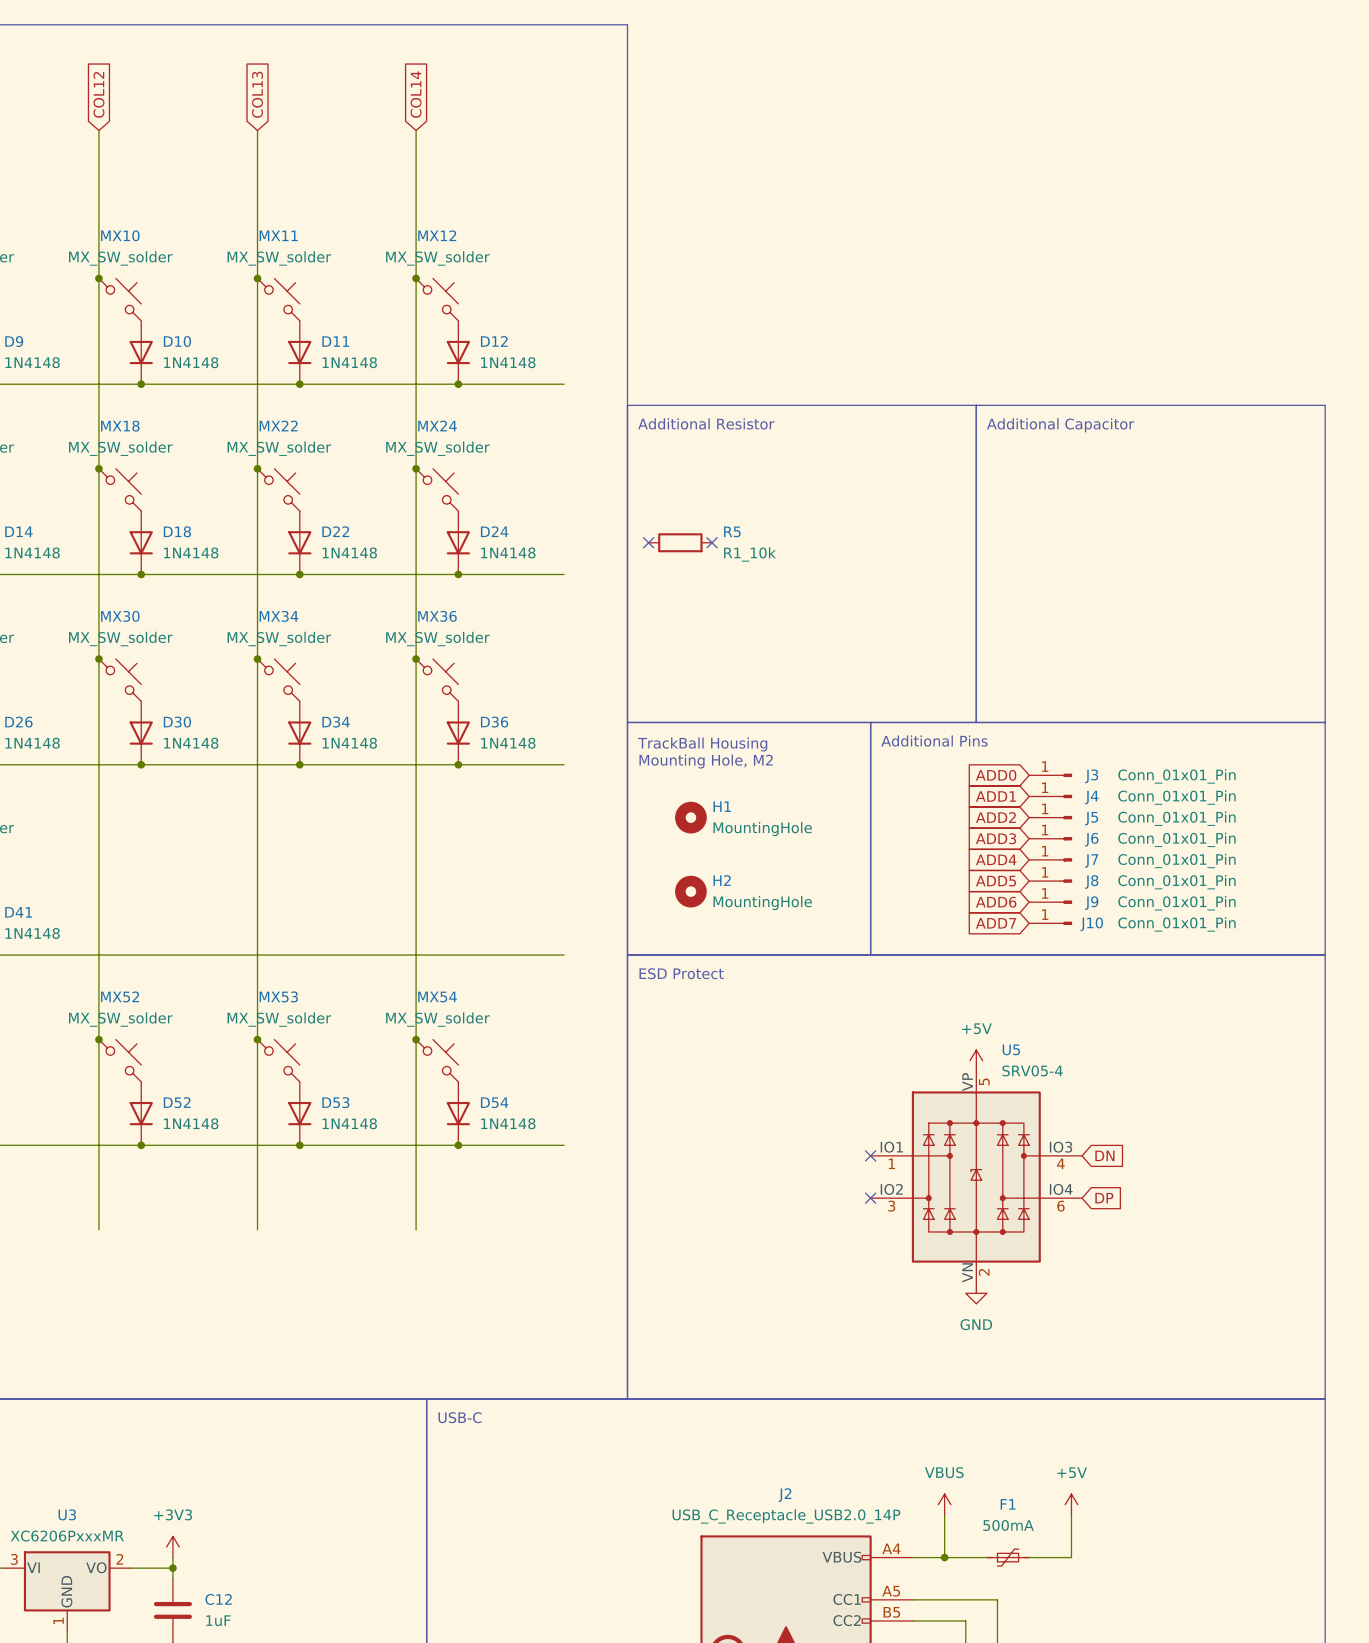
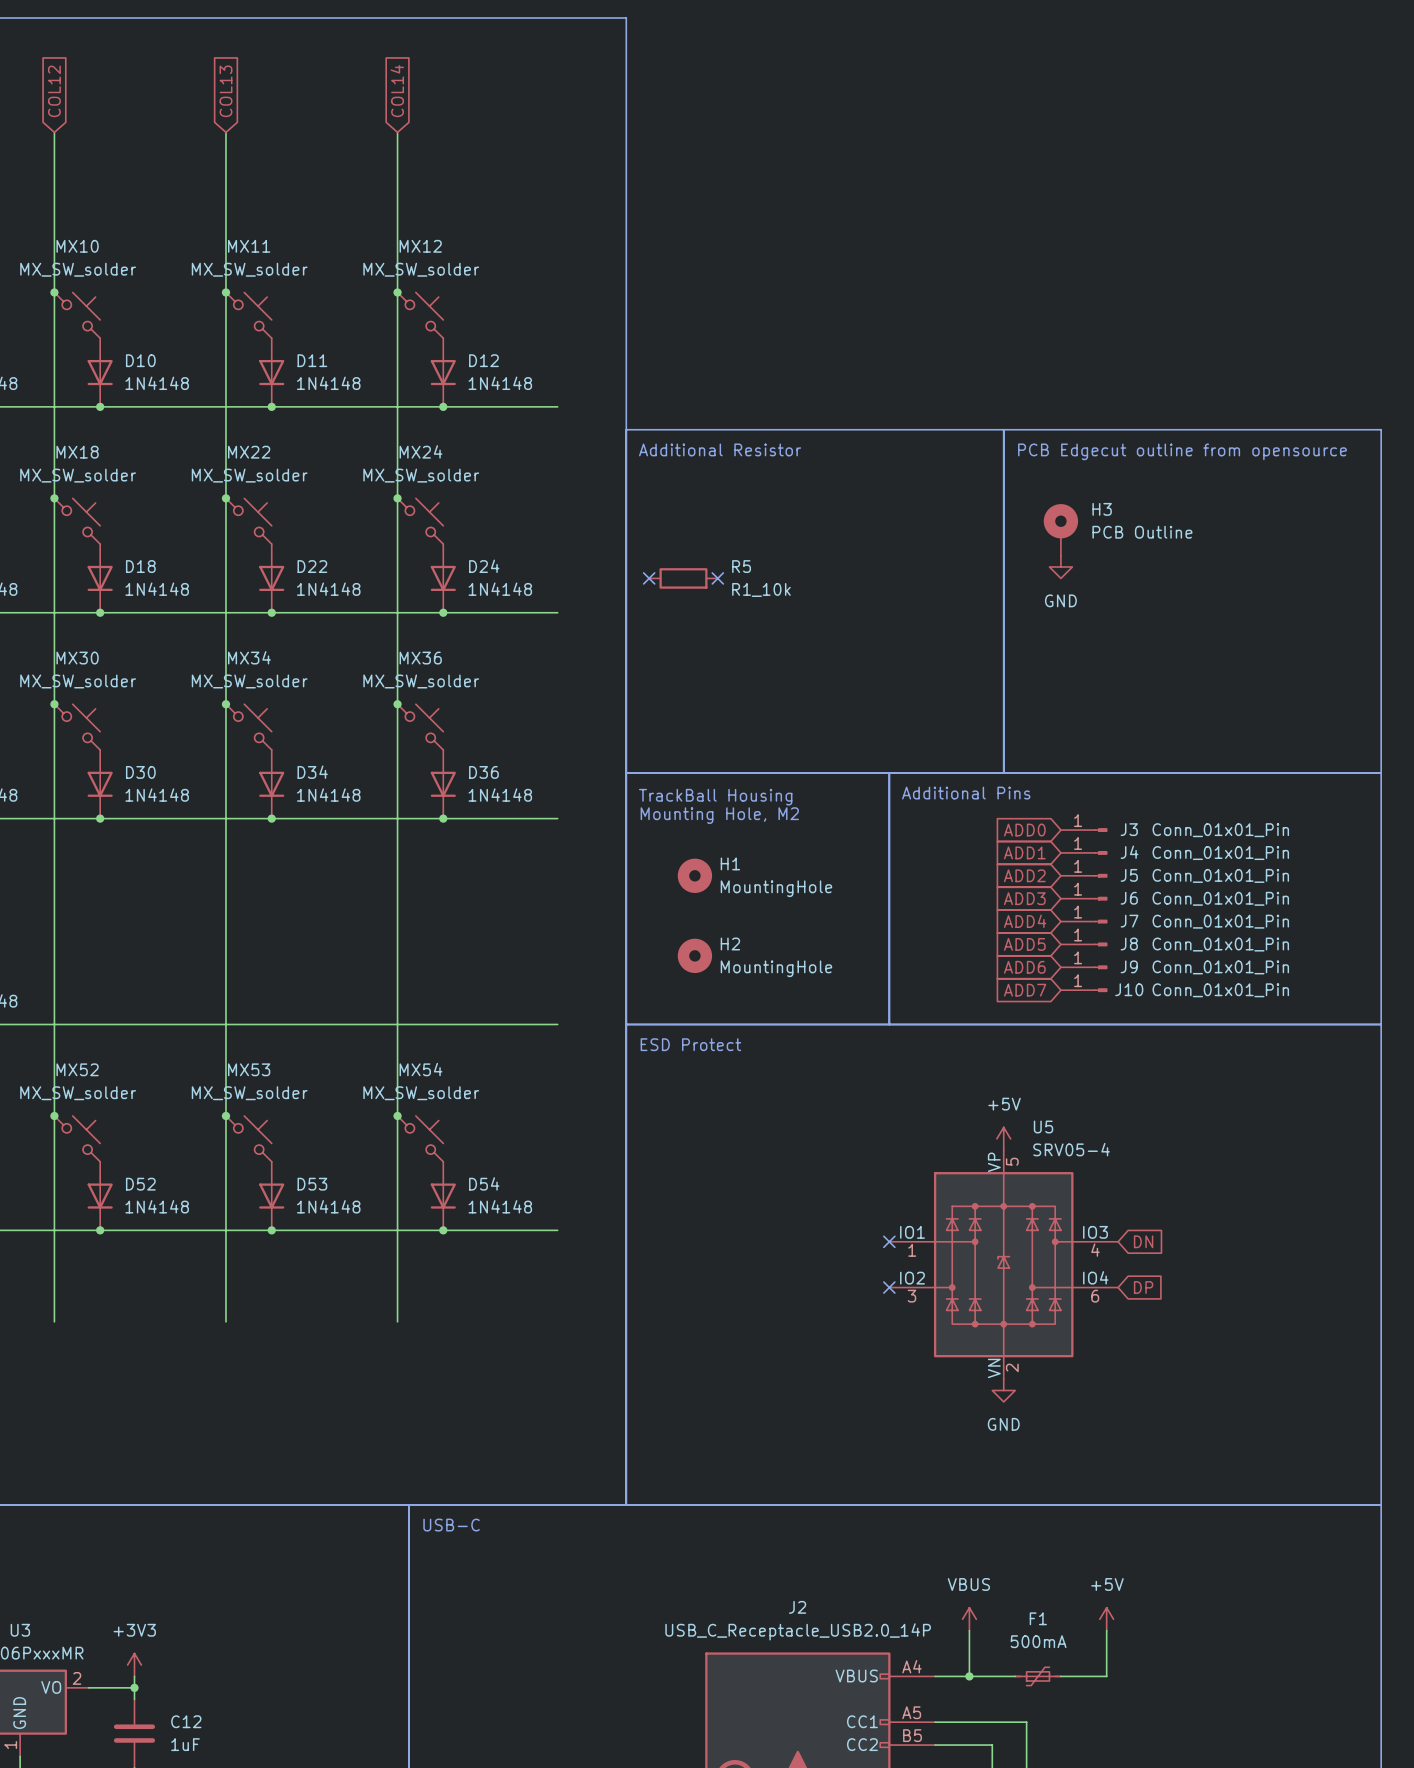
text: Additional Capacitor (1060, 425) -> PCB Edgecut outline from opensource (1182, 451)
H3: none -> PCB Outline (1060, 529)
power symbol: none -> GND (1060, 566)

